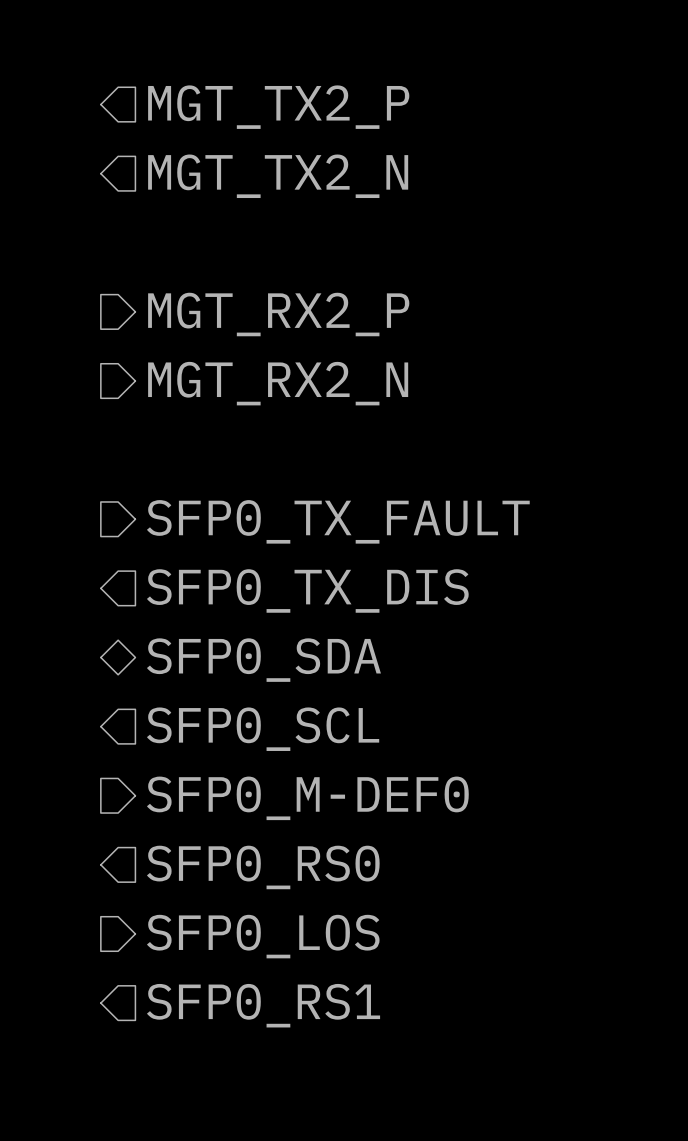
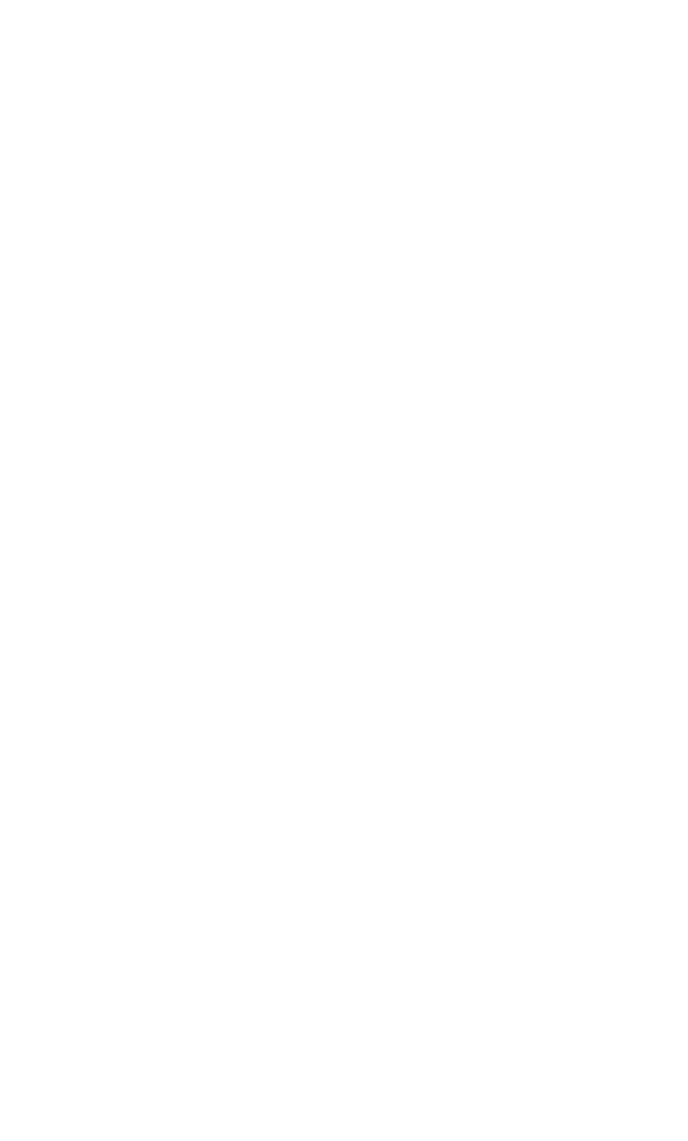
hierarchical label: MGT_TX2_P (278, 107) -> none
hierarchical label: MGT_TX2_N (278, 176) -> none
hierarchical label: MGT_RX2_P (278, 314) -> none
hierarchical label: MGT_RX2_N (278, 383) -> none
hierarchical label: SFP0_TX_FAULT (338, 521) -> none
hierarchical label: SFP0_TX_DIS (307, 590) -> none
hierarchical label: SFP0_SDA (263, 660) -> none
hierarchical label: SFP0_SCL (263, 729) -> none
hierarchical label: SFP0_M-DEF0 (307, 798) -> none
hierarchical label: SFP0_RS0 (263, 867) -> none
hierarchical label: SFP0_LOS (263, 936) -> none
hierarchical label: SFP0_RS1 (263, 1005) -> none

